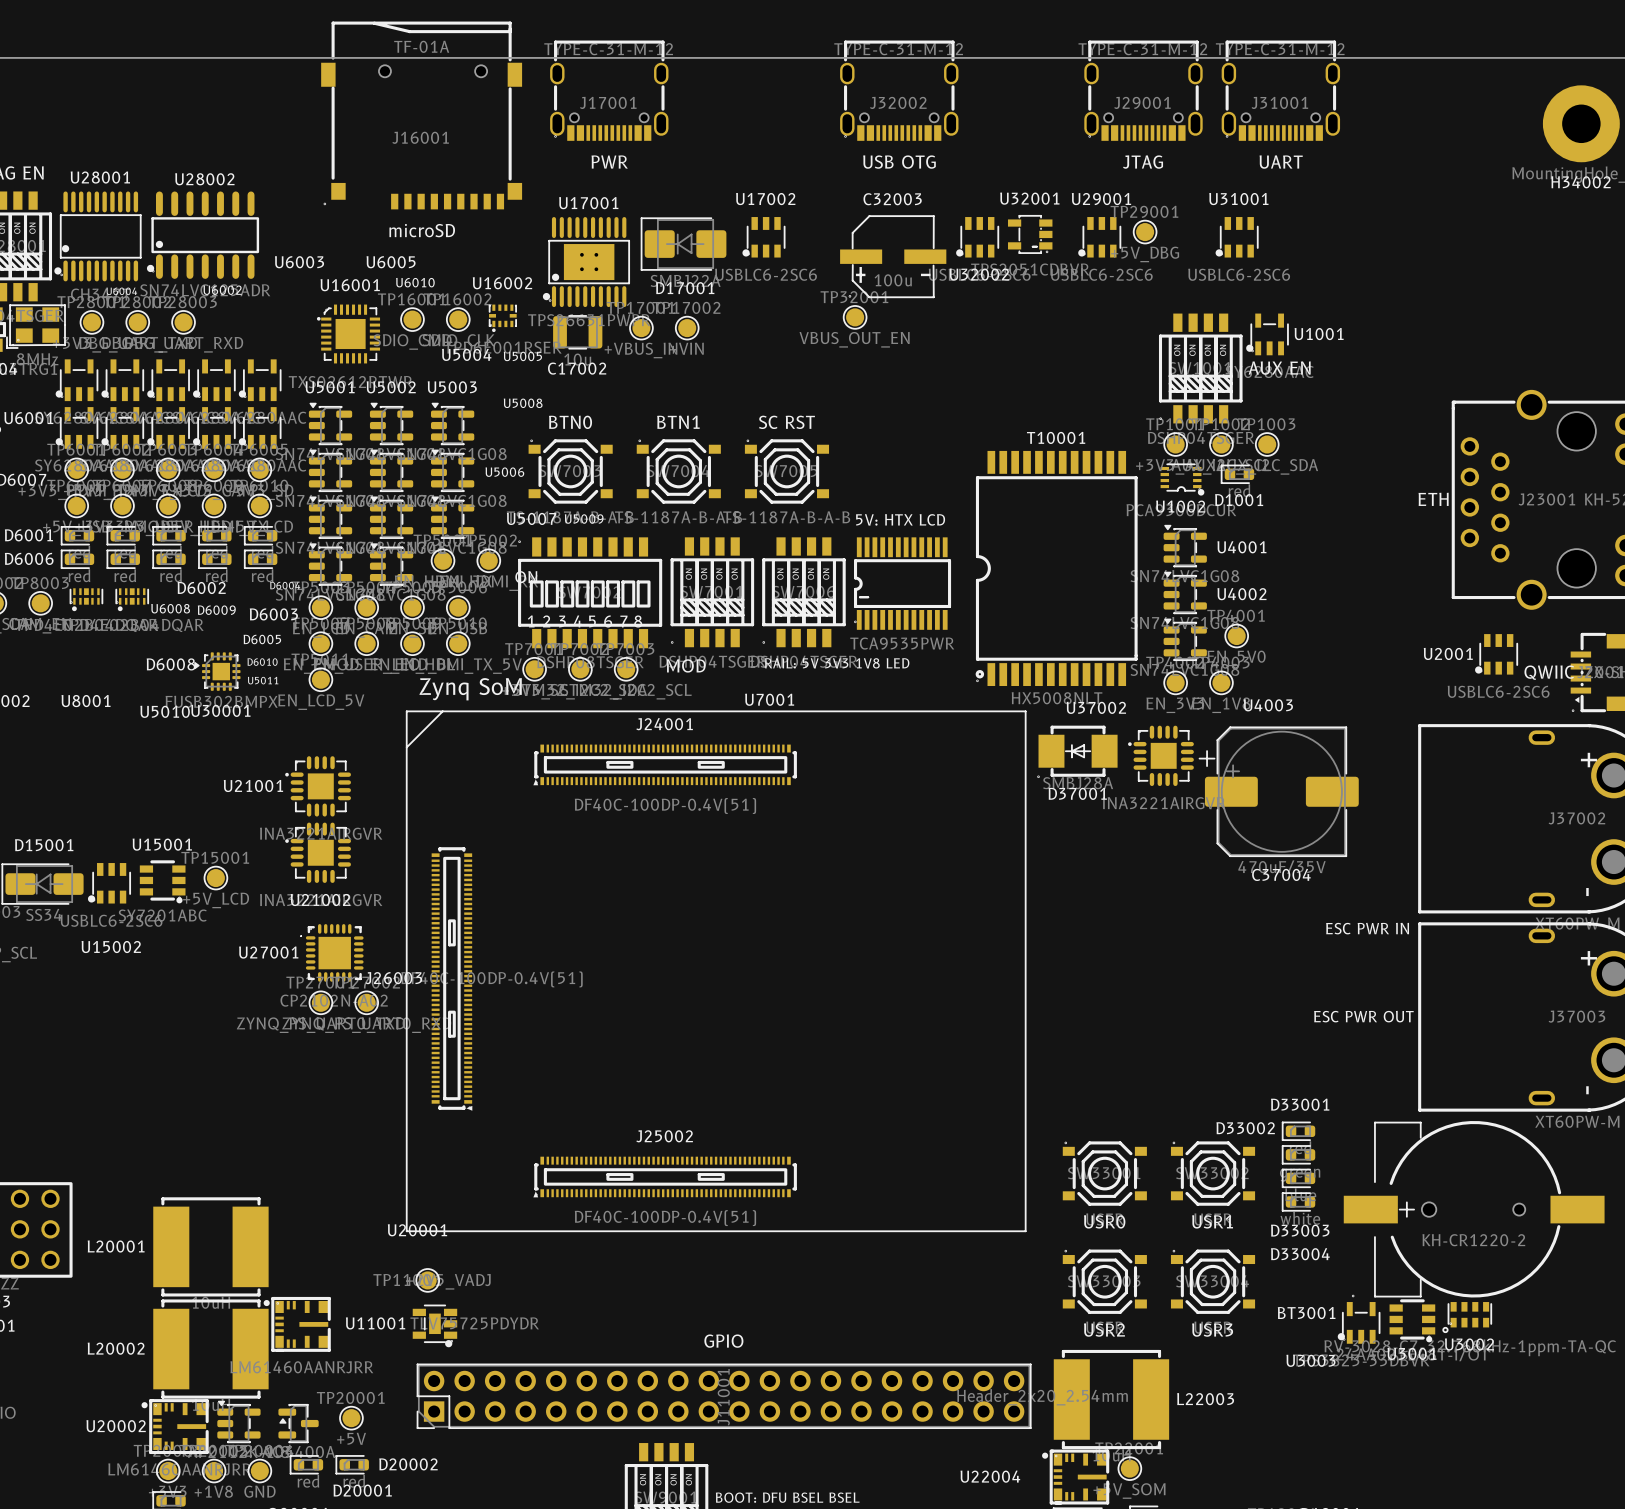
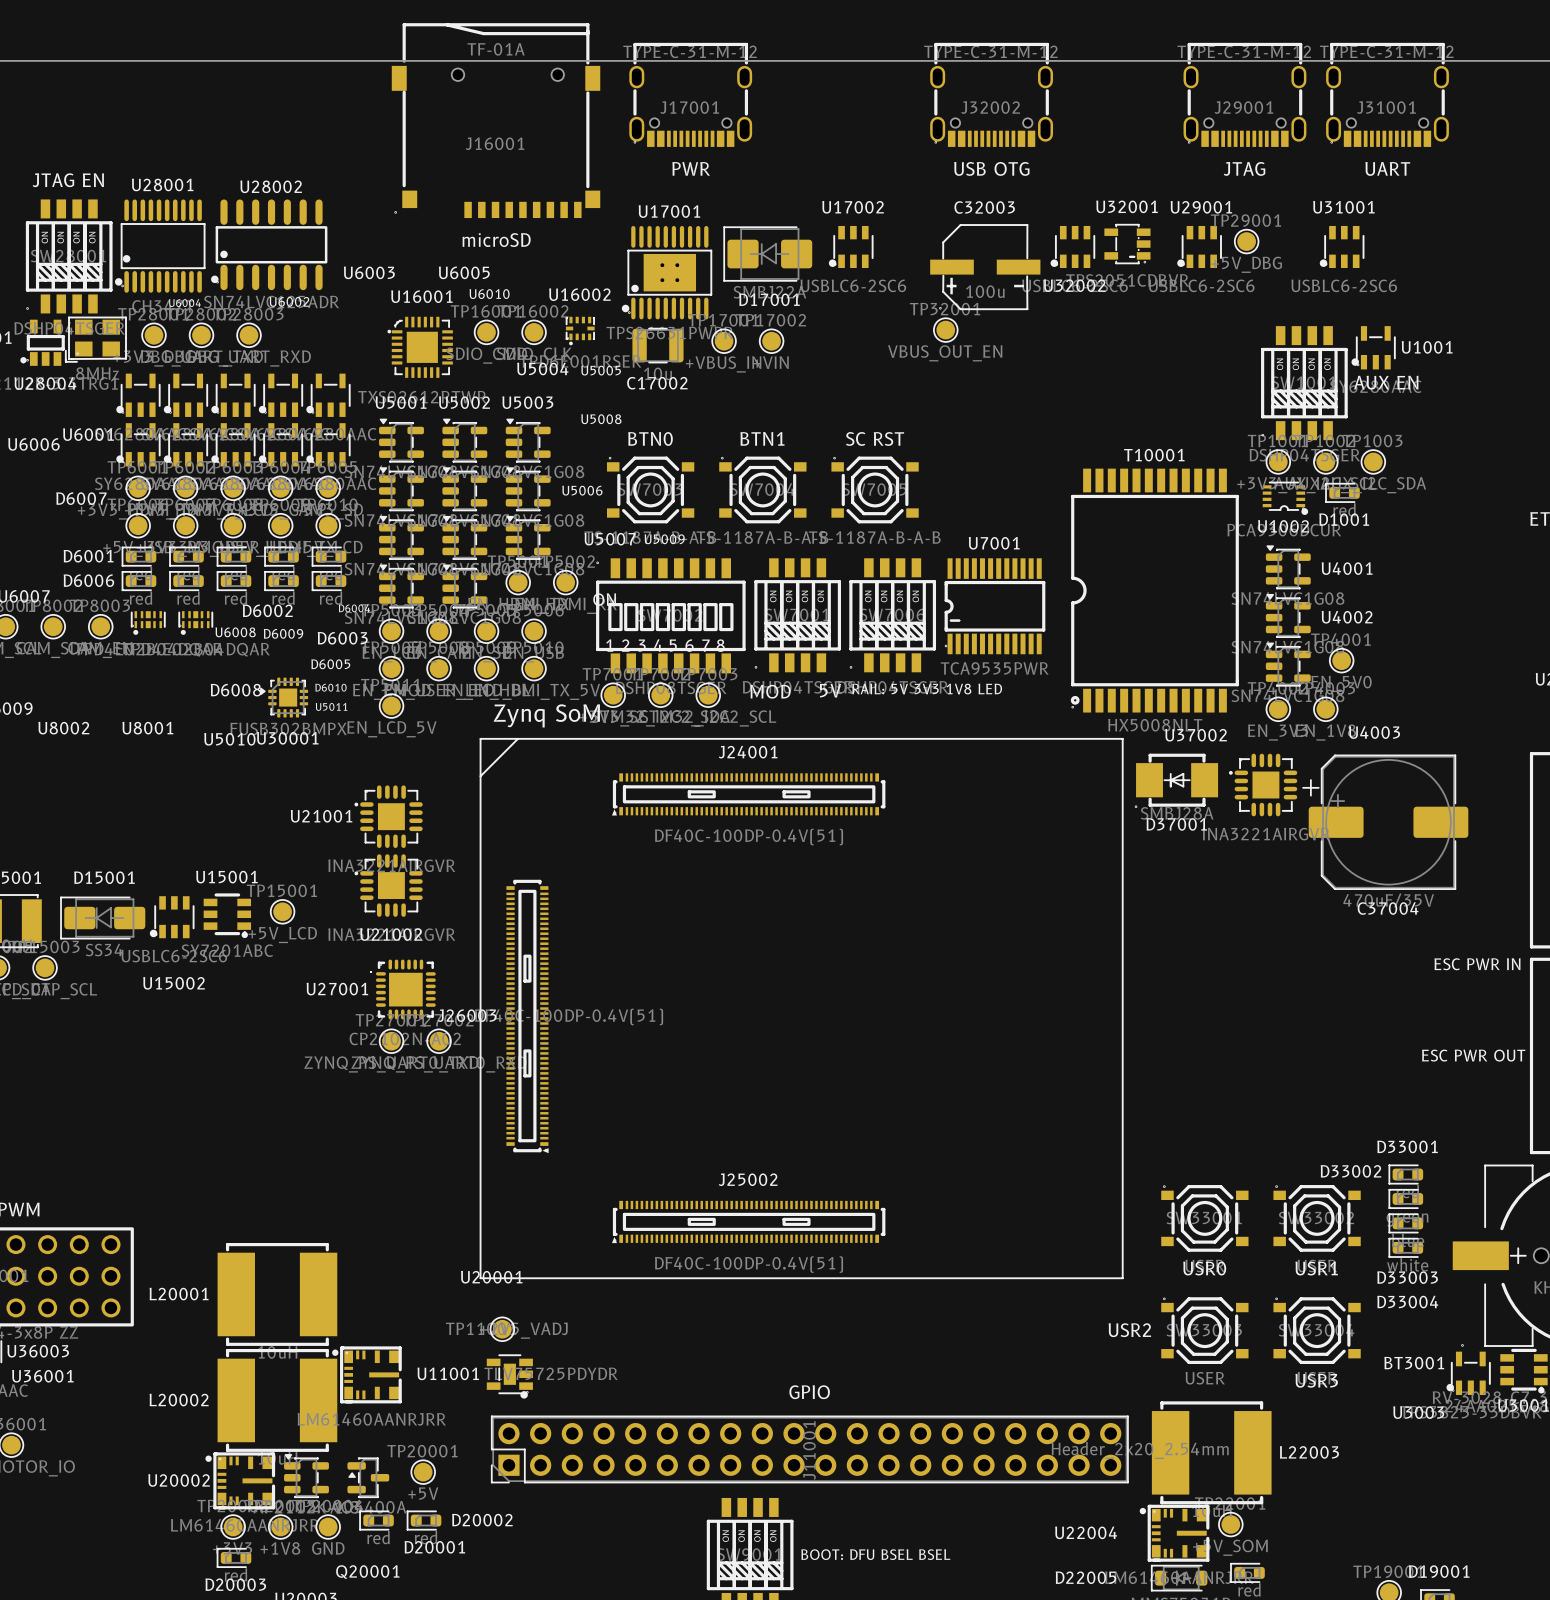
text: 5V: HTX LCD (900, 519) -> none
text: none -> 5V (830, 690)
U7001 name position: U7001 (769, 699) -> U7001 (994, 543)
text position: USR2 (1104, 1330) -> USR2 (1129, 1330)

